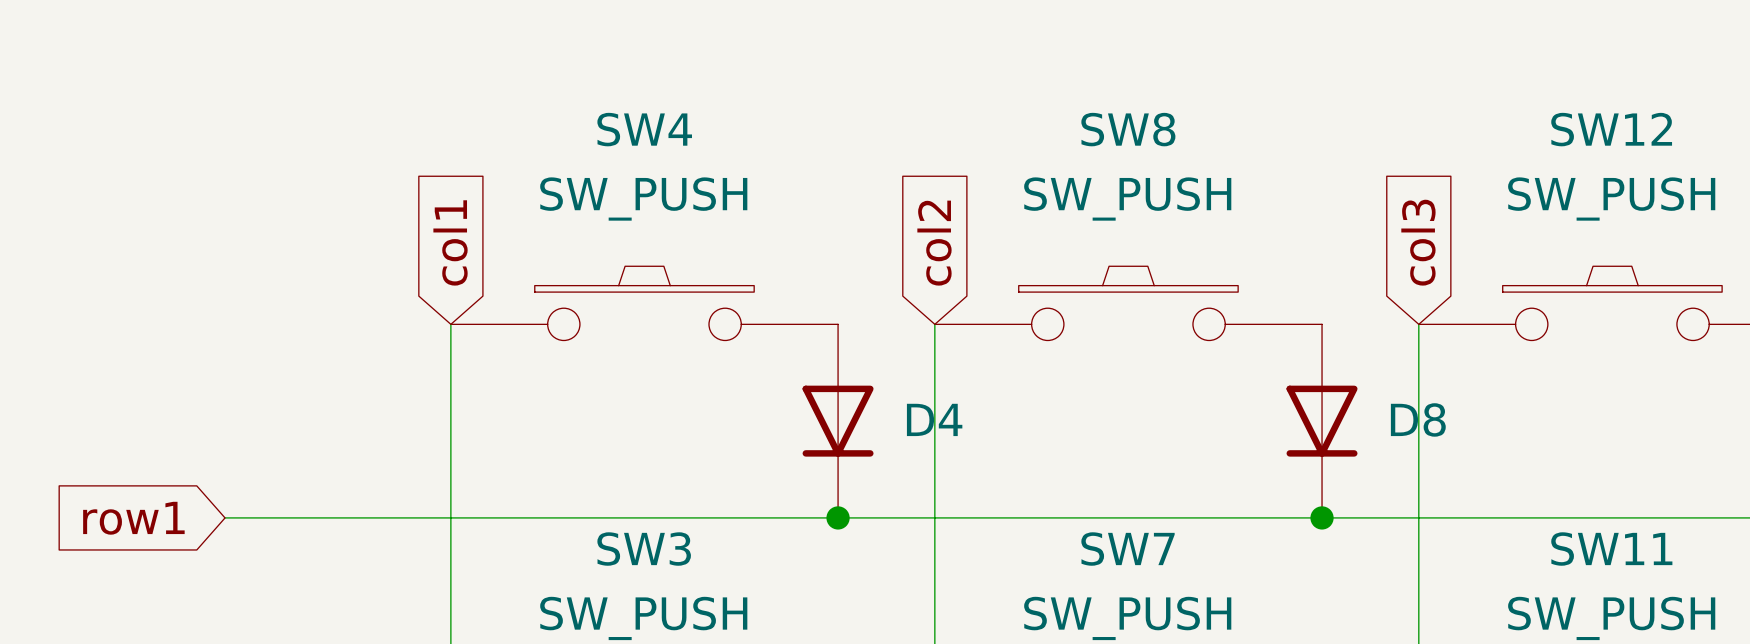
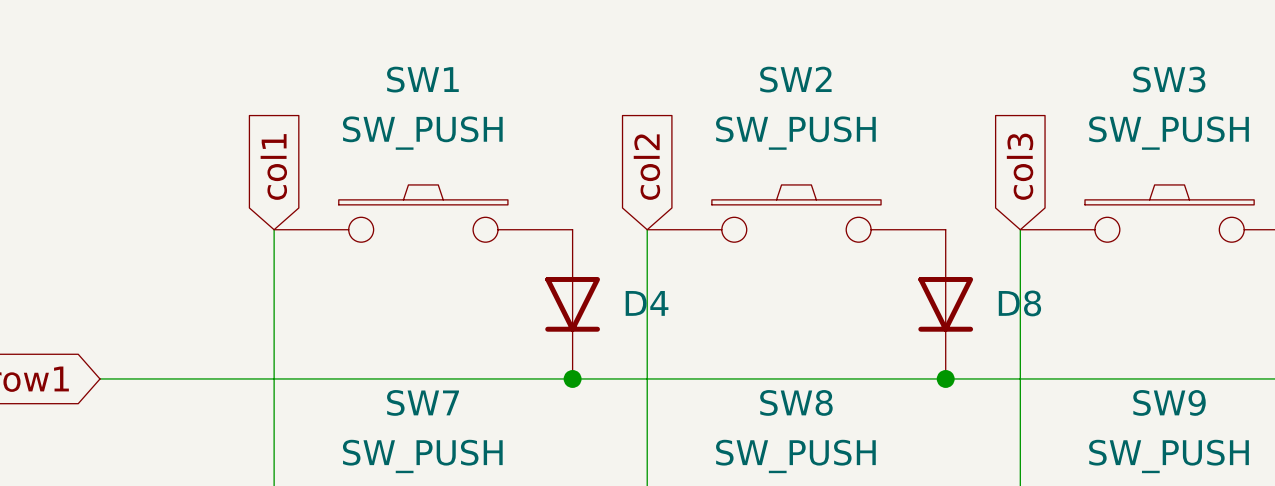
SW4 name: SW4 (644, 129) -> SW1 (422, 79)
SW8 name: SW8 (1128, 129) -> SW2 (795, 79)
SW12 name: SW12 (1611, 129) -> SW3 (1169, 79)
SW3 name: SW3 (644, 549) -> SW7 (423, 402)
SW7 name: SW7 (1128, 549) -> SW8 (796, 402)
SW11 name: SW11 (1611, 549) -> SW9 (1169, 402)

